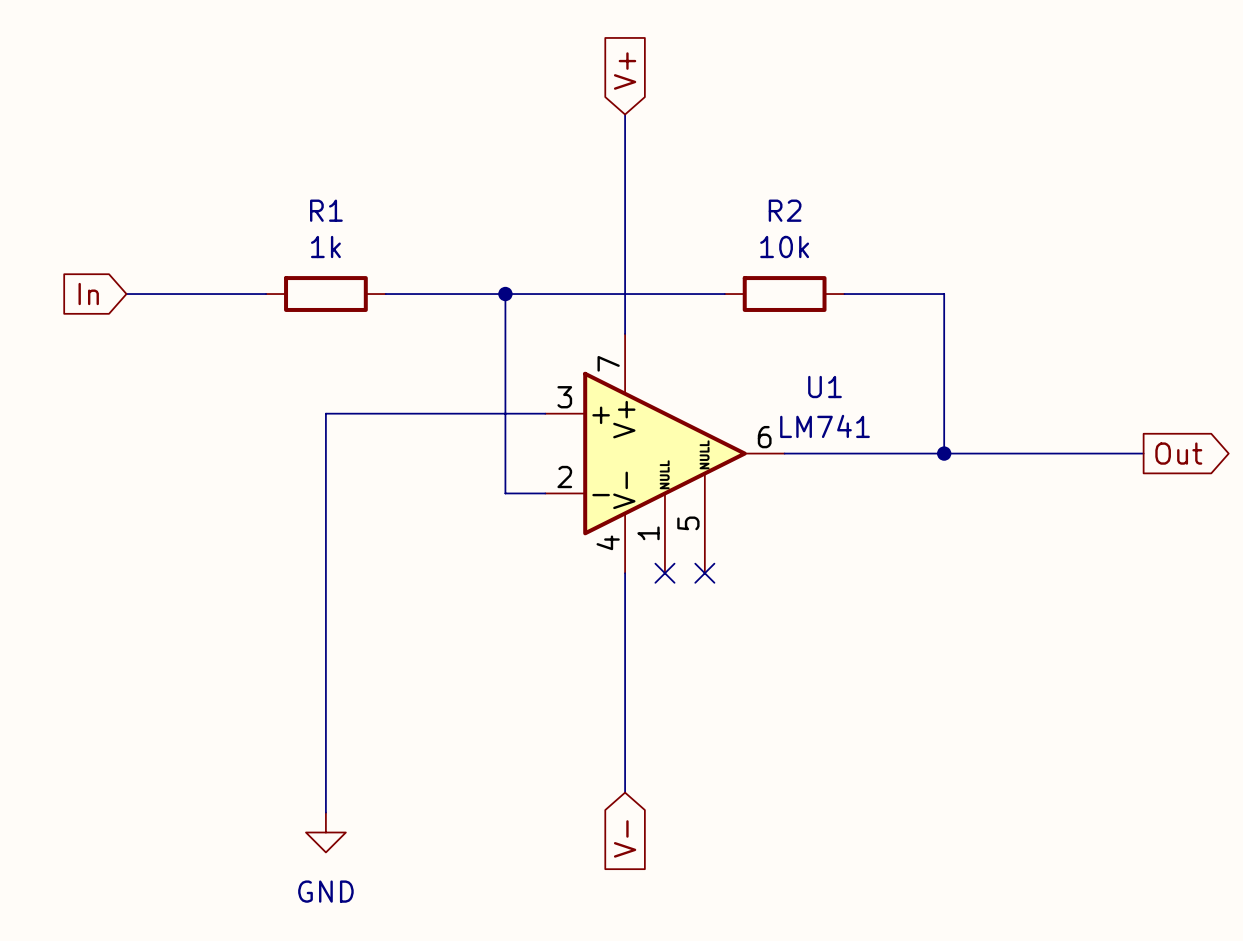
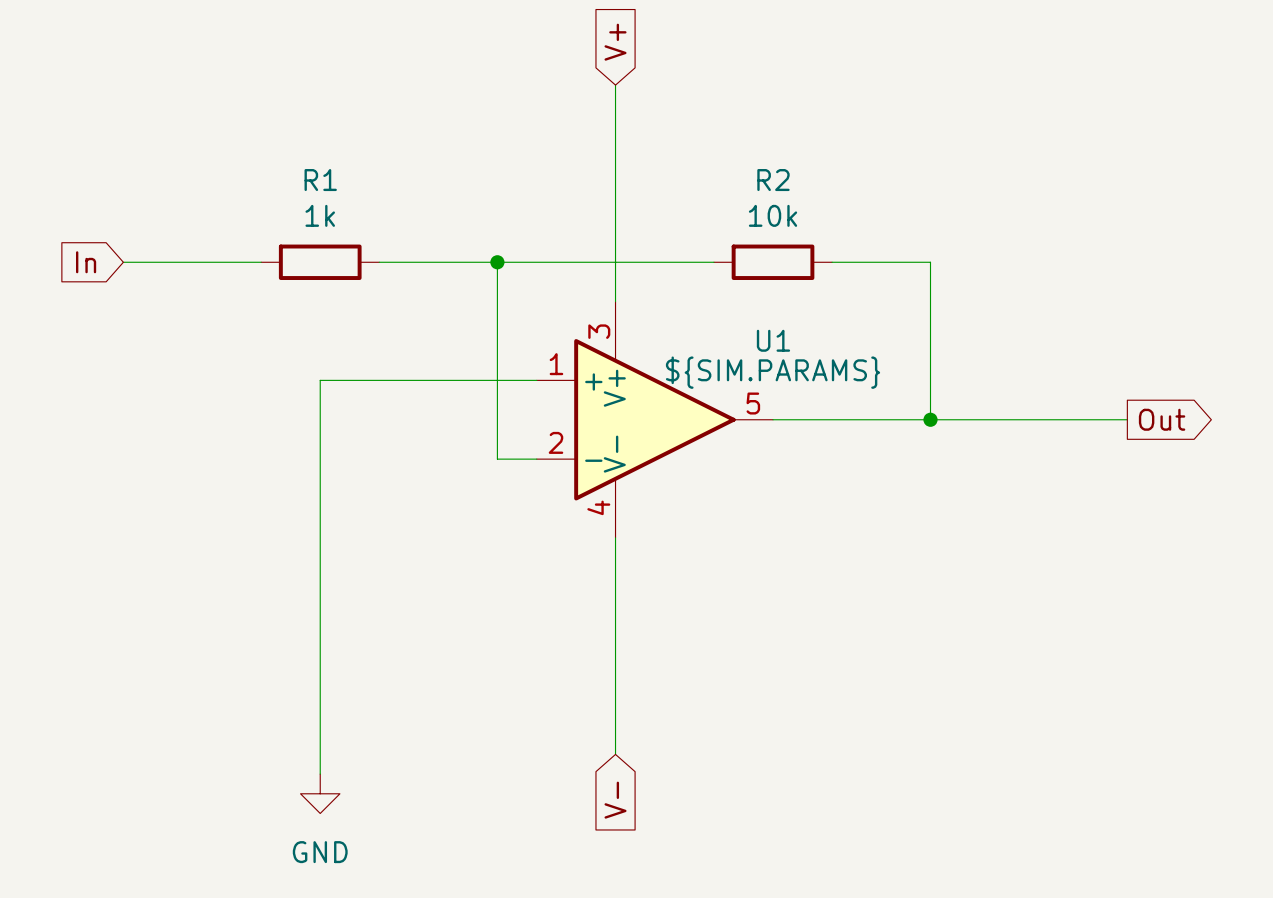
U1 symbol: [545, 333, 785, 574] -> [536, 301, 774, 538]
U1 name position: U1 (824, 387) -> U1 (773, 340)
U1 value: LM741 (824, 426) -> ${SIM.PARAMS} (773, 372)
no-connect mark: (664, 573) -> none
no-connect mark: (704, 573) -> none

